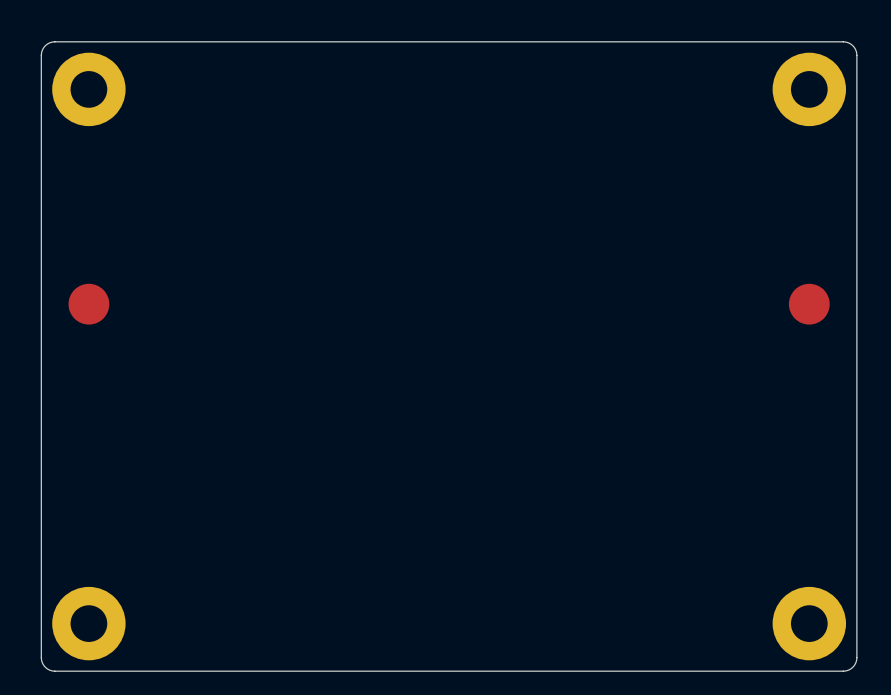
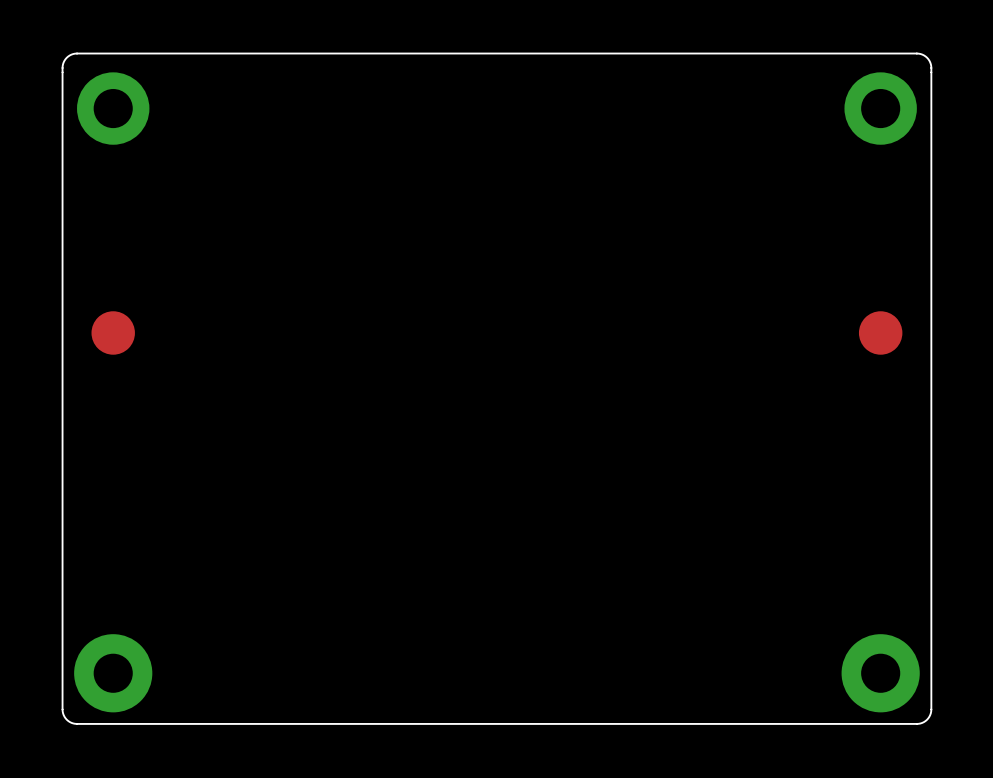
part footprint: [52, 52, 126, 127] -> [77, 72, 150, 145]
part footprint: [772, 52, 847, 127] -> [844, 72, 917, 145]

